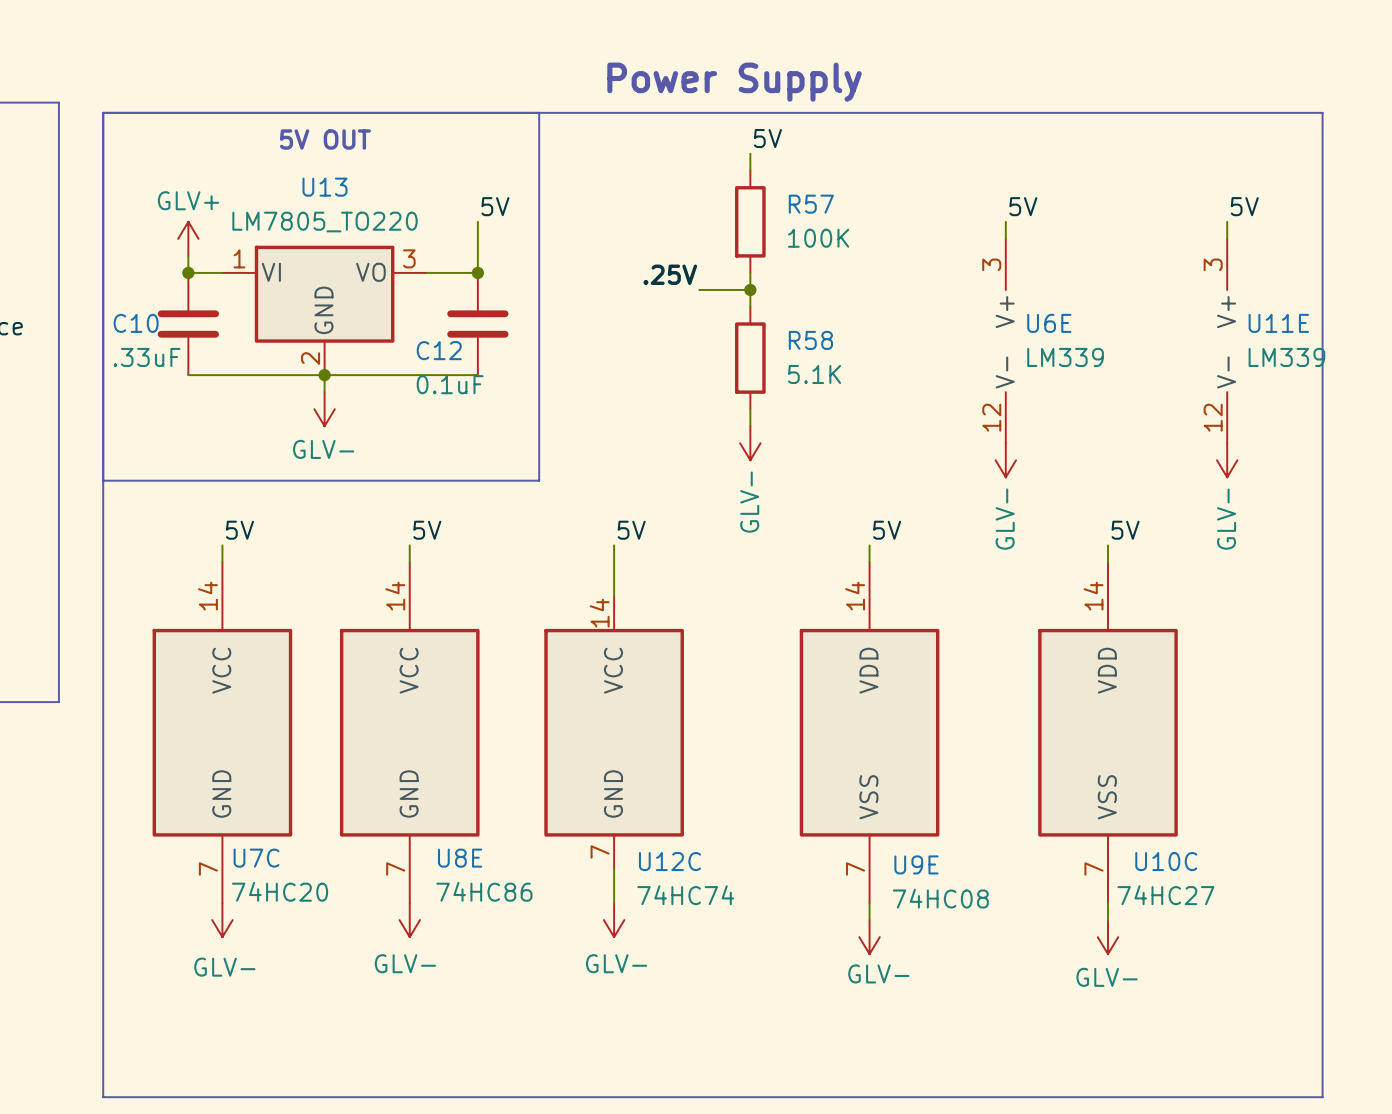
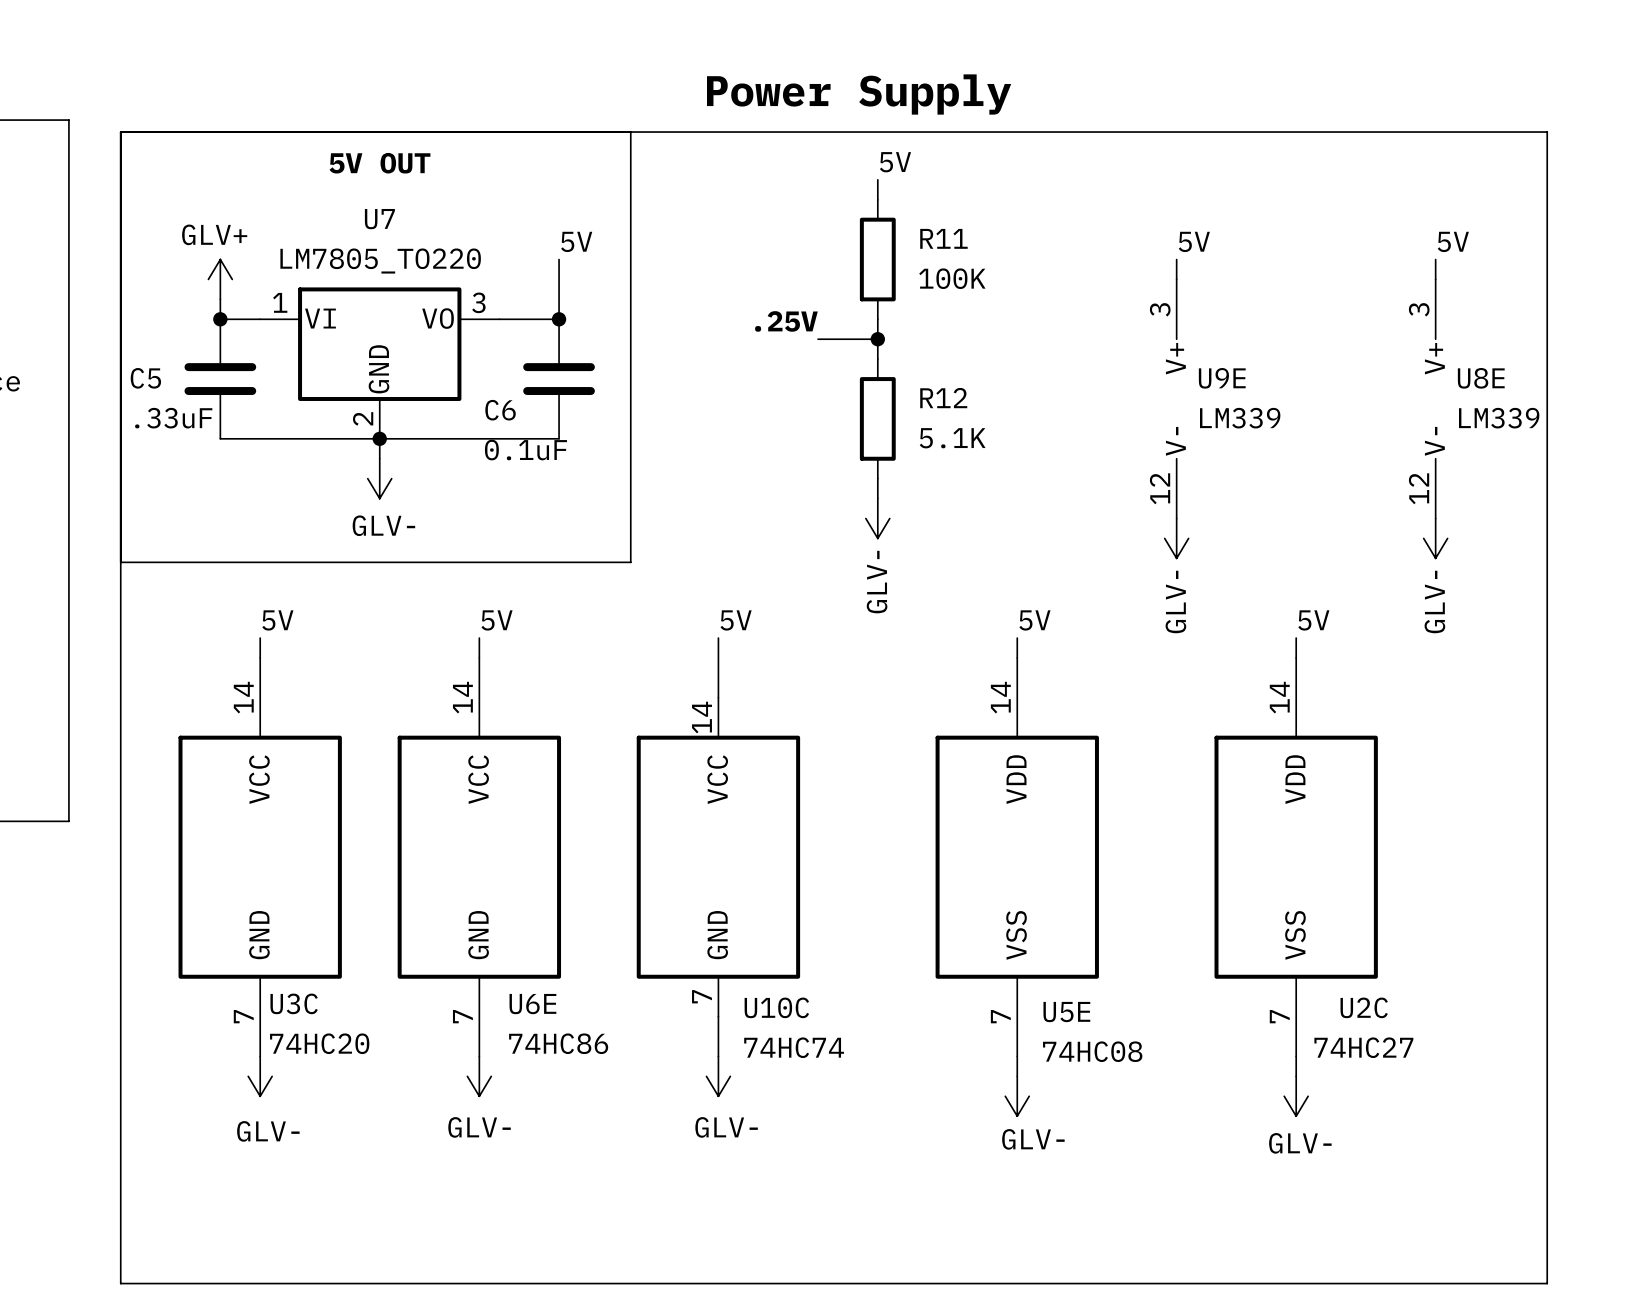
U13 name: U13 (325, 187) -> U7 (379, 219)
R57 name: R57 (811, 204) -> R11 (943, 238)
C10 name: C10 (136, 323) -> C5 (145, 378)
U6E name: U6E (1049, 323) -> U9E (1222, 378)
U11E name: U11E (1278, 323) -> U8E (1481, 378)
R58 name: R58 (810, 340) -> R12 (943, 398)
C12 name: C12 (439, 350) -> C6 (500, 410)
U7C name: U7C (256, 858) -> U3C (294, 1003)
U8E name: U8E (460, 858) -> U6E (532, 1004)
U12C name: U12C (669, 861) -> U10C (776, 1007)
U10C name: U10C (1166, 861) -> U2C (1364, 1007)
U9E name: U9E (916, 864) -> U5E (1066, 1012)

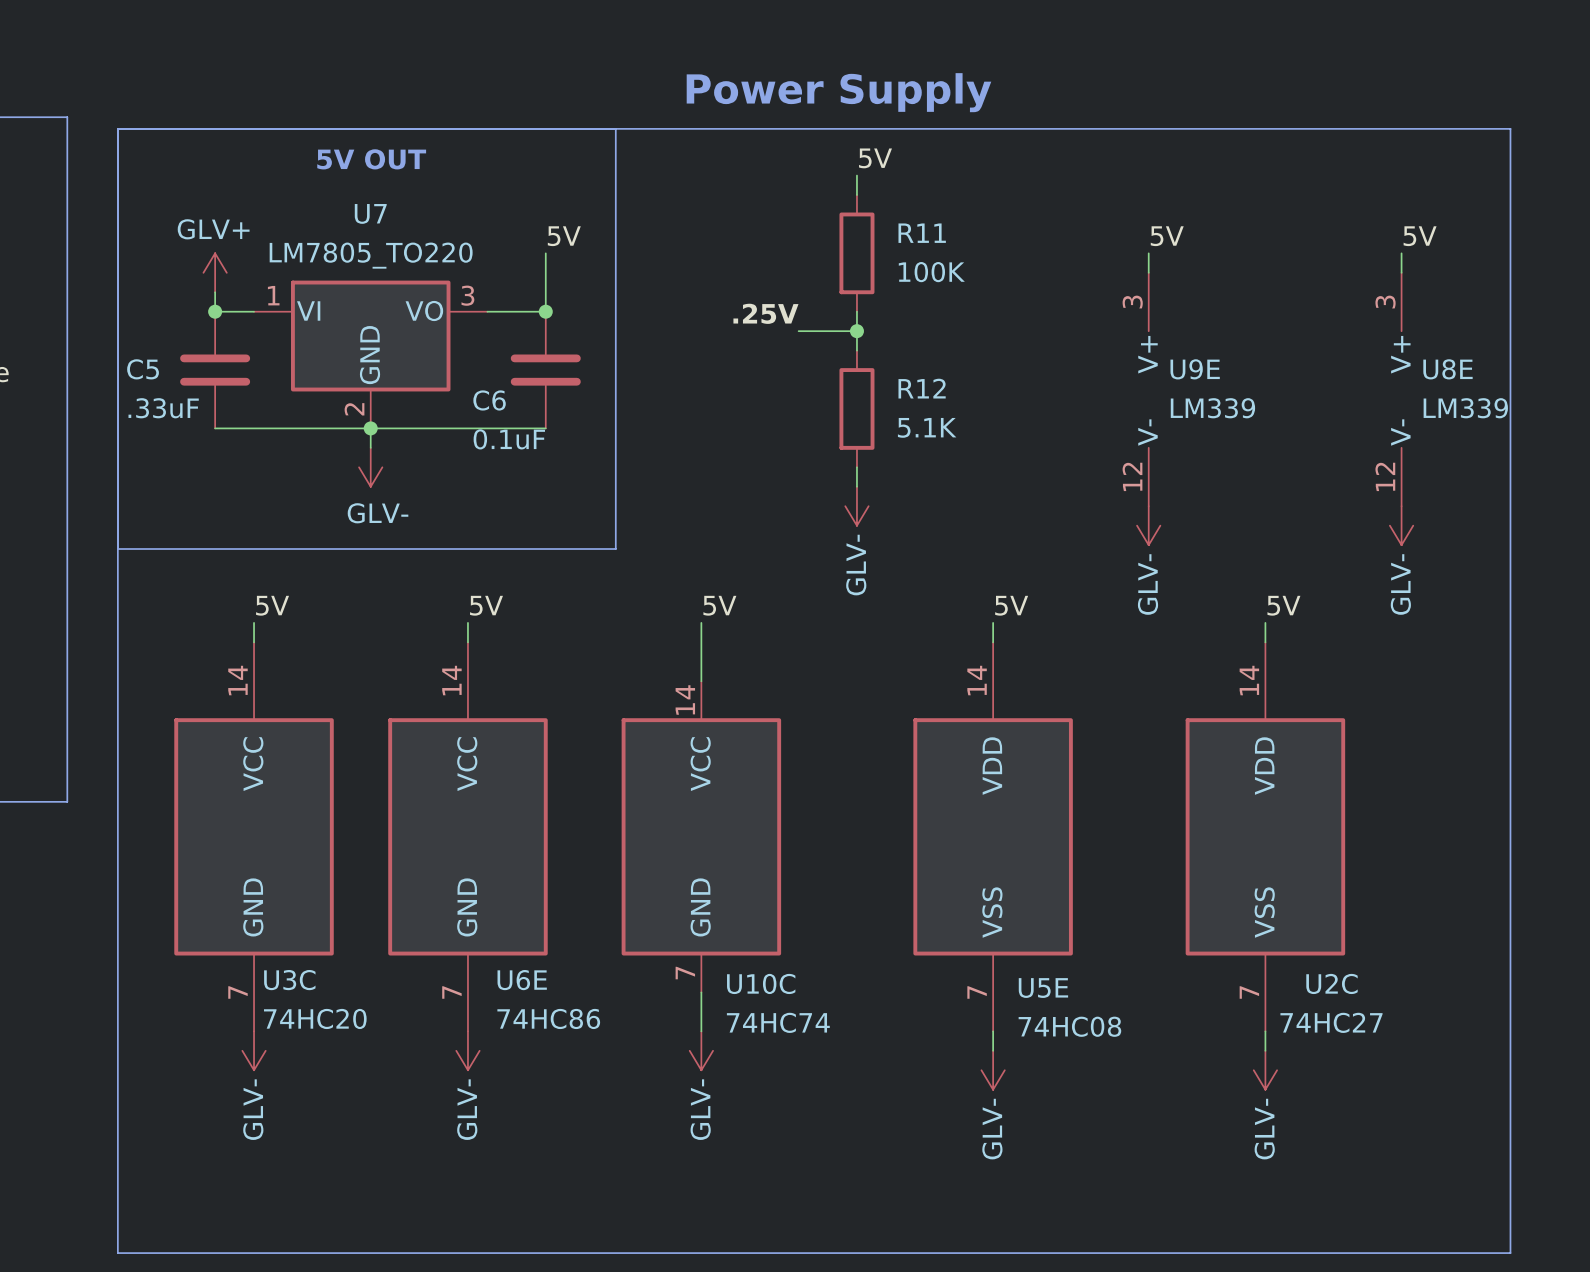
power symbol text rotation: 0° (479, 1127) -> 90° counterclockwise (467, 1109)
power symbol text rotation: 0° (726, 1127) -> 90° counterclockwise (700, 1109)
power symbol text rotation: 0° (268, 1131) -> 90° counterclockwise (253, 1109)
power symbol text rotation: 0° (1033, 1139) -> 90° counterclockwise (992, 1129)
power symbol text rotation: 0° (1300, 1143) -> 90° counterclockwise (1264, 1129)

